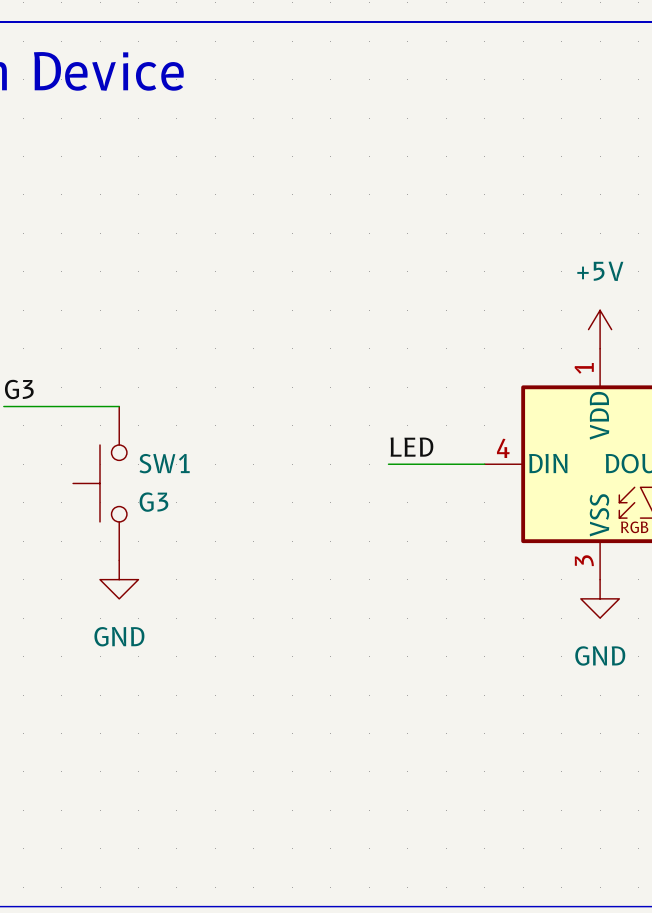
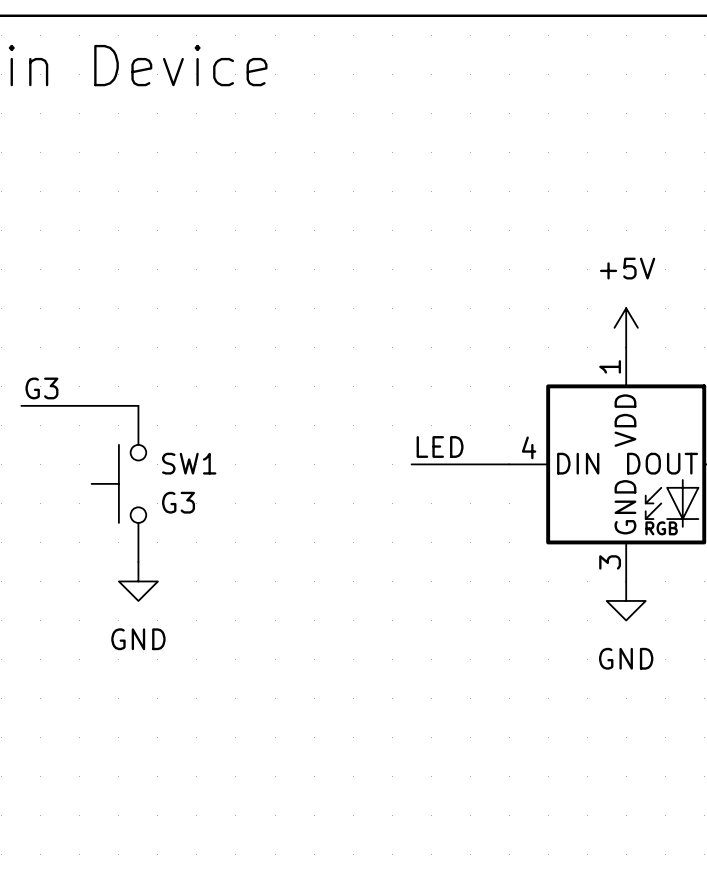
part pin name: VSS (599, 515) -> GND (625, 507)

